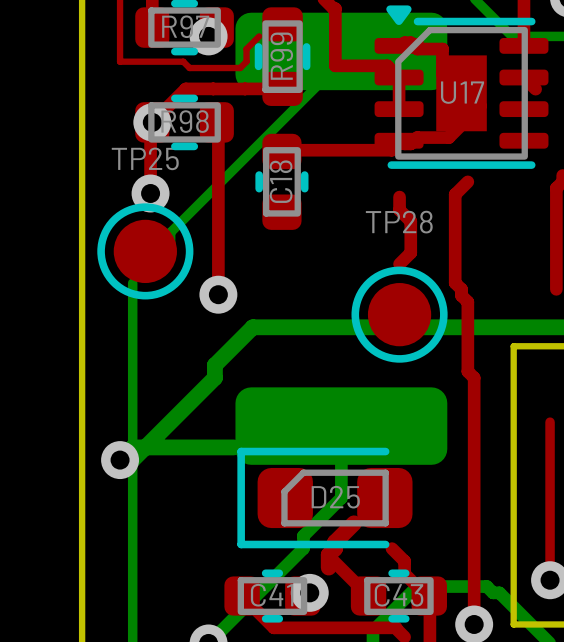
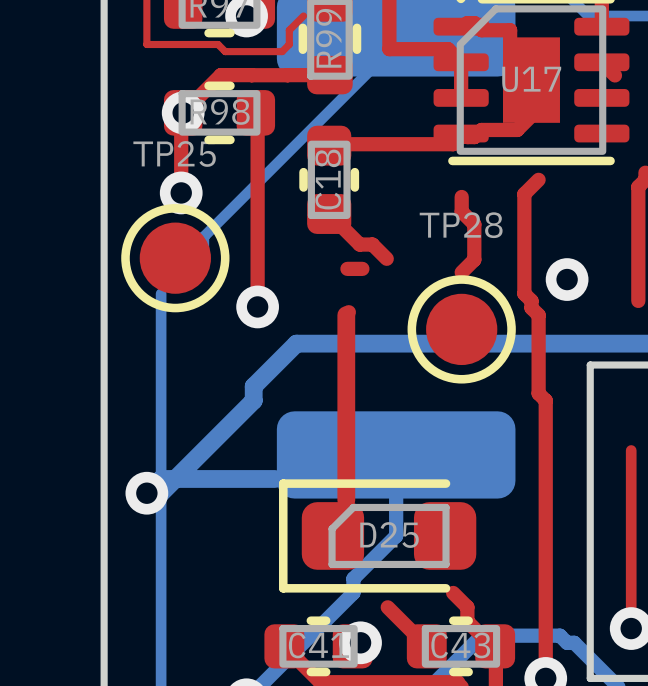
top track: none -> (329, 214) (359, 244) (372, 244) (386, 258)
top track: none -> (347, 268) (362, 268)
via: none -> (567, 279)
top track: none -> (346, 315) (346, 500)
top track: (354, 523) (335, 542) (335, 548) (328, 554) (328, 567) -> none

